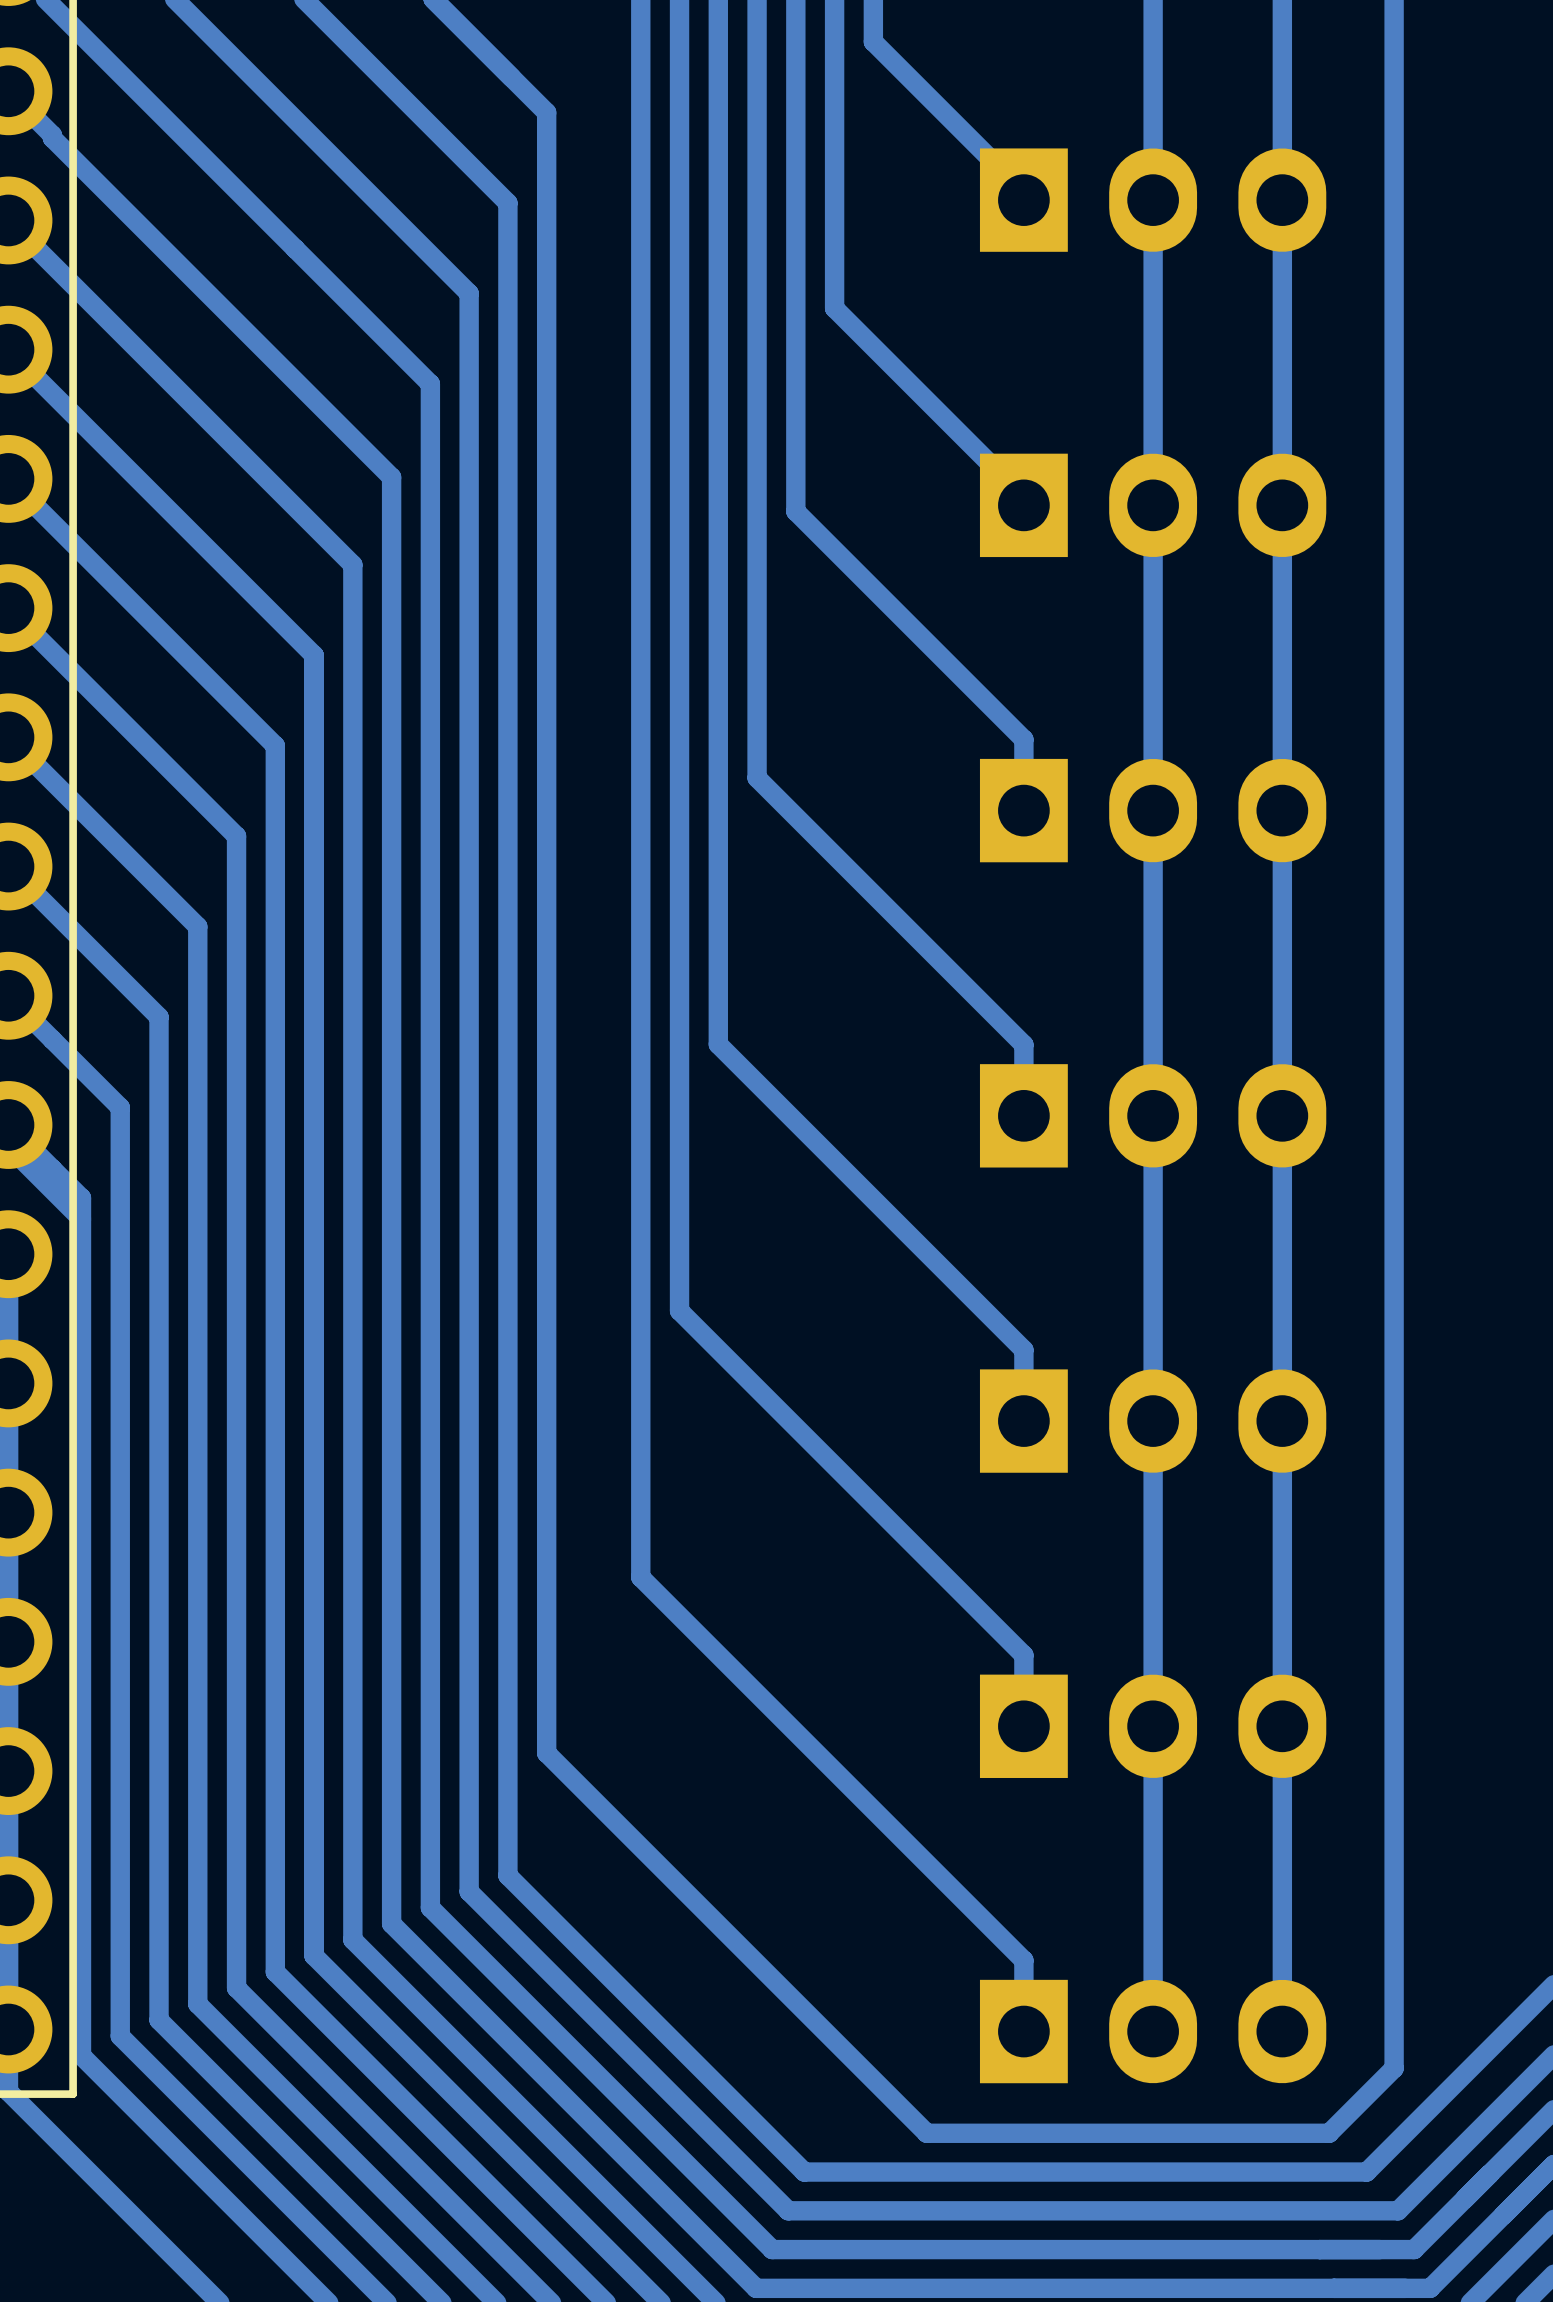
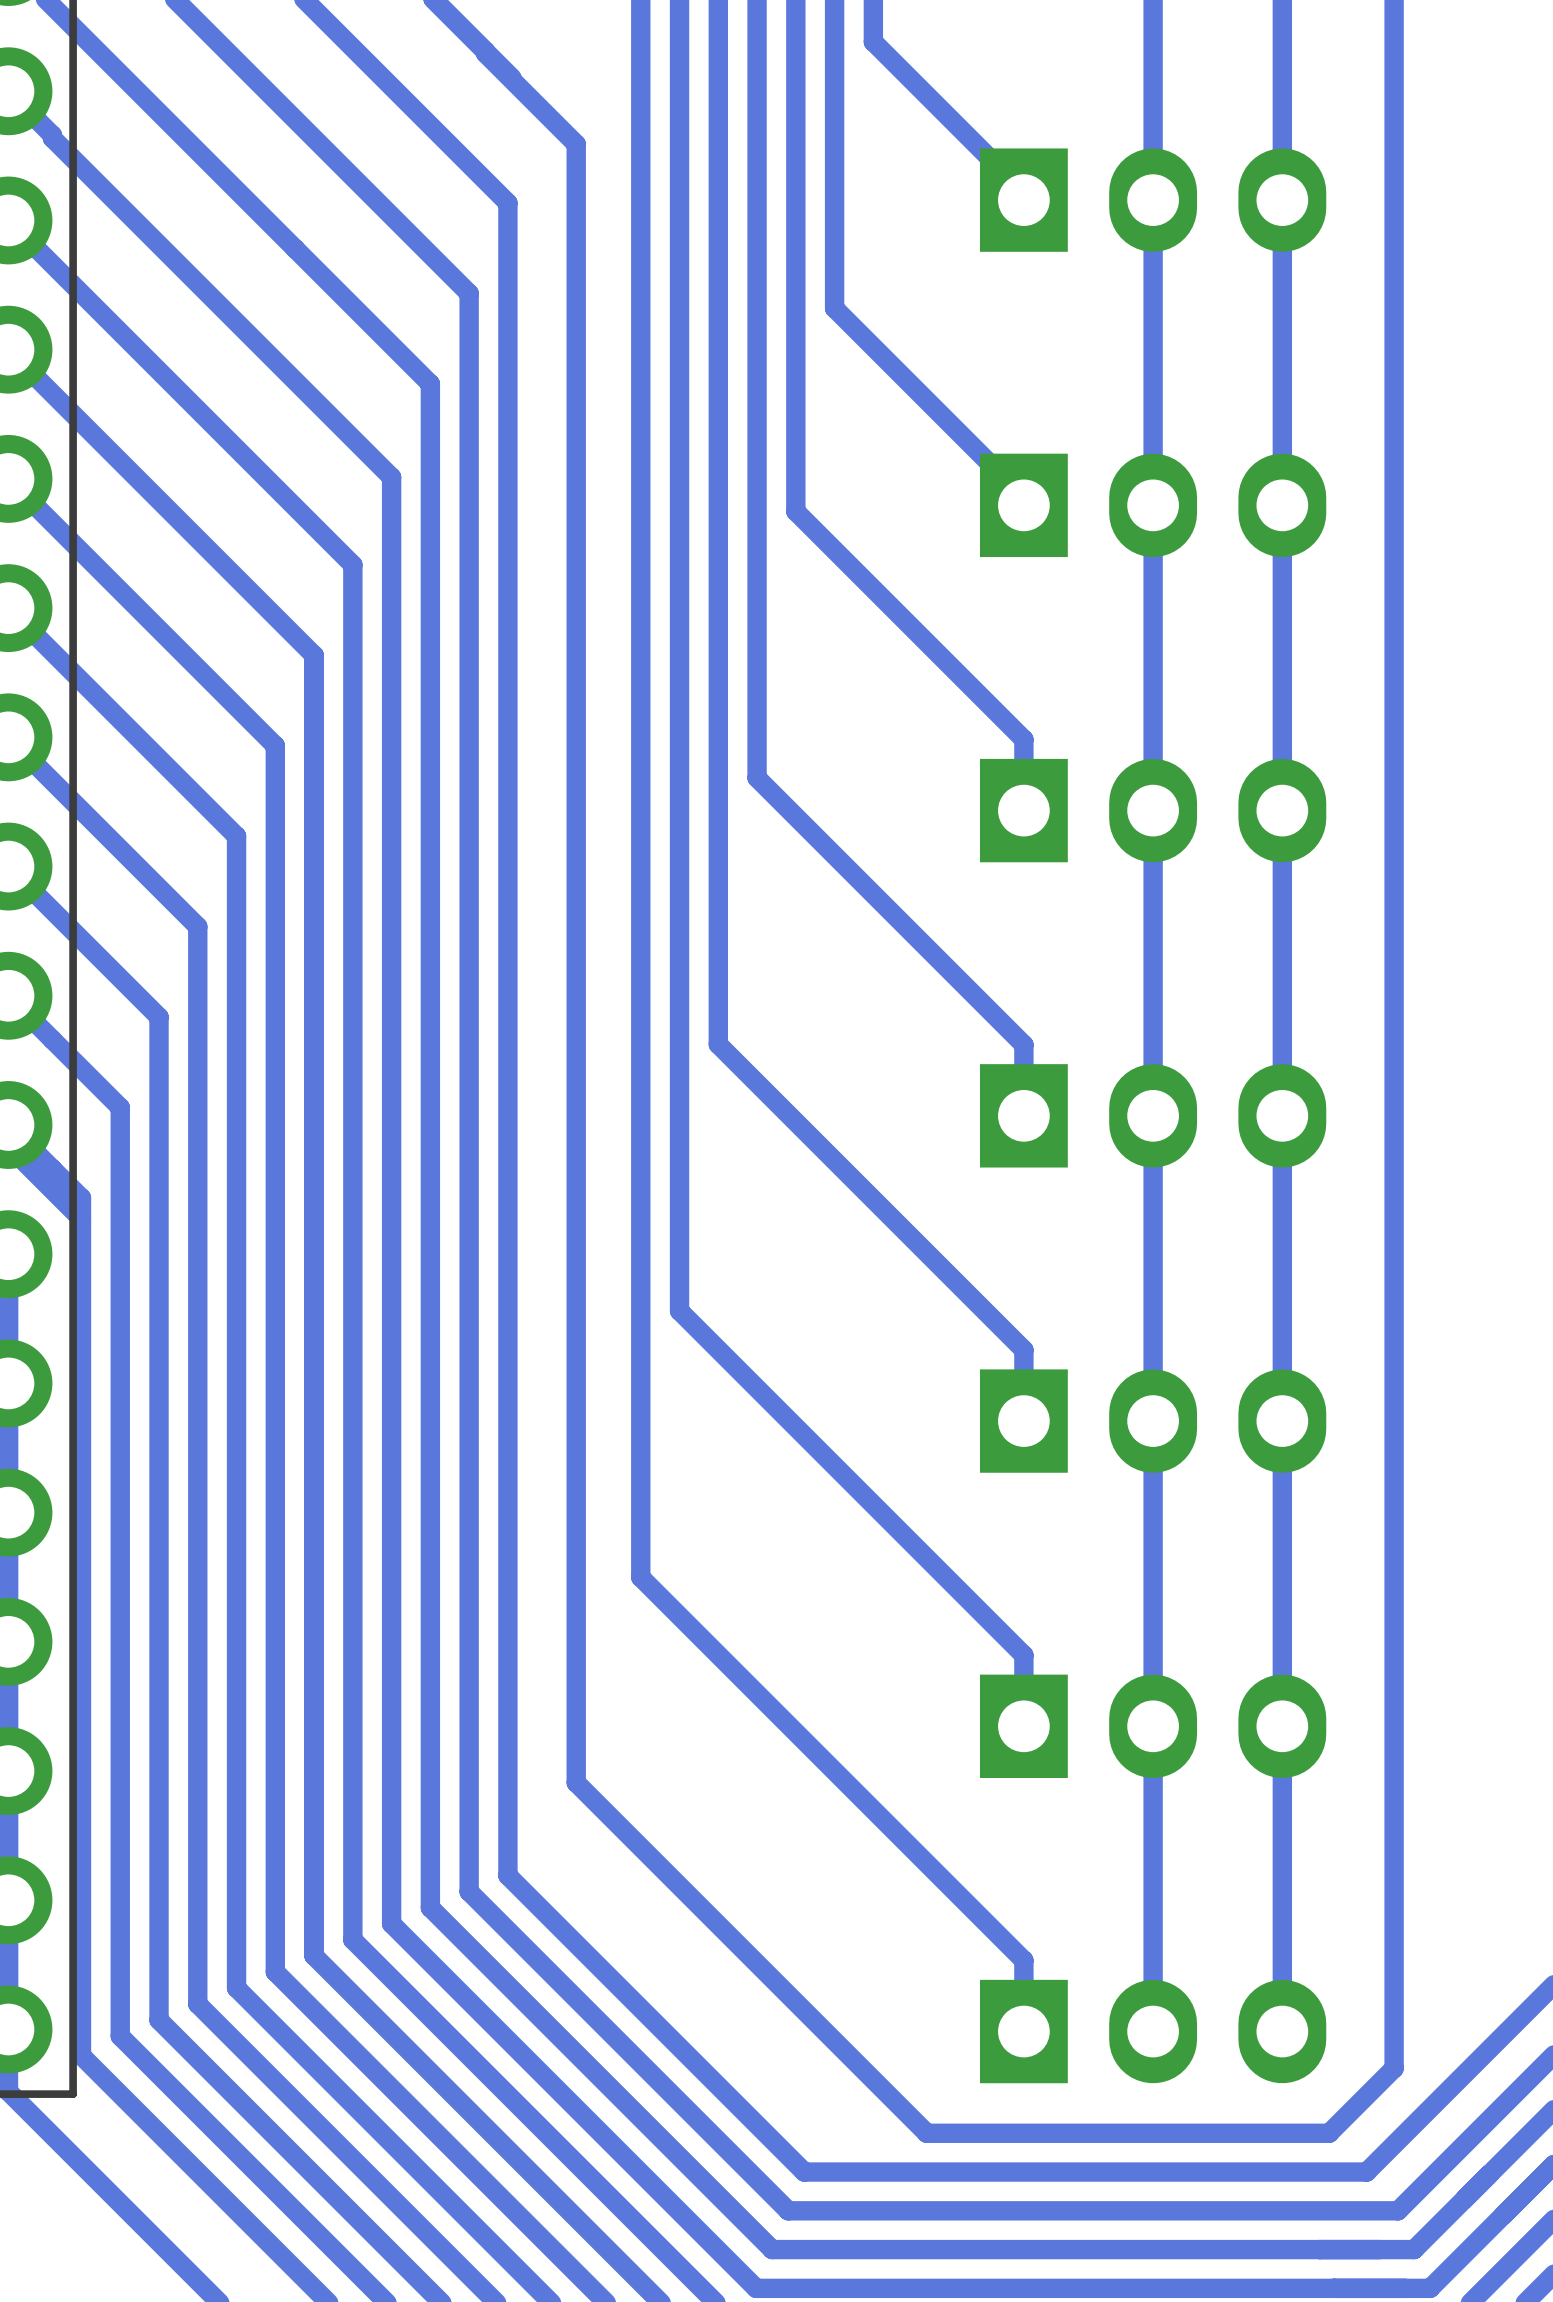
track: (511, 77) (546, 112) (546, 1753) (576, 1782) -> (485, 51) (576, 144) (576, 1782)

